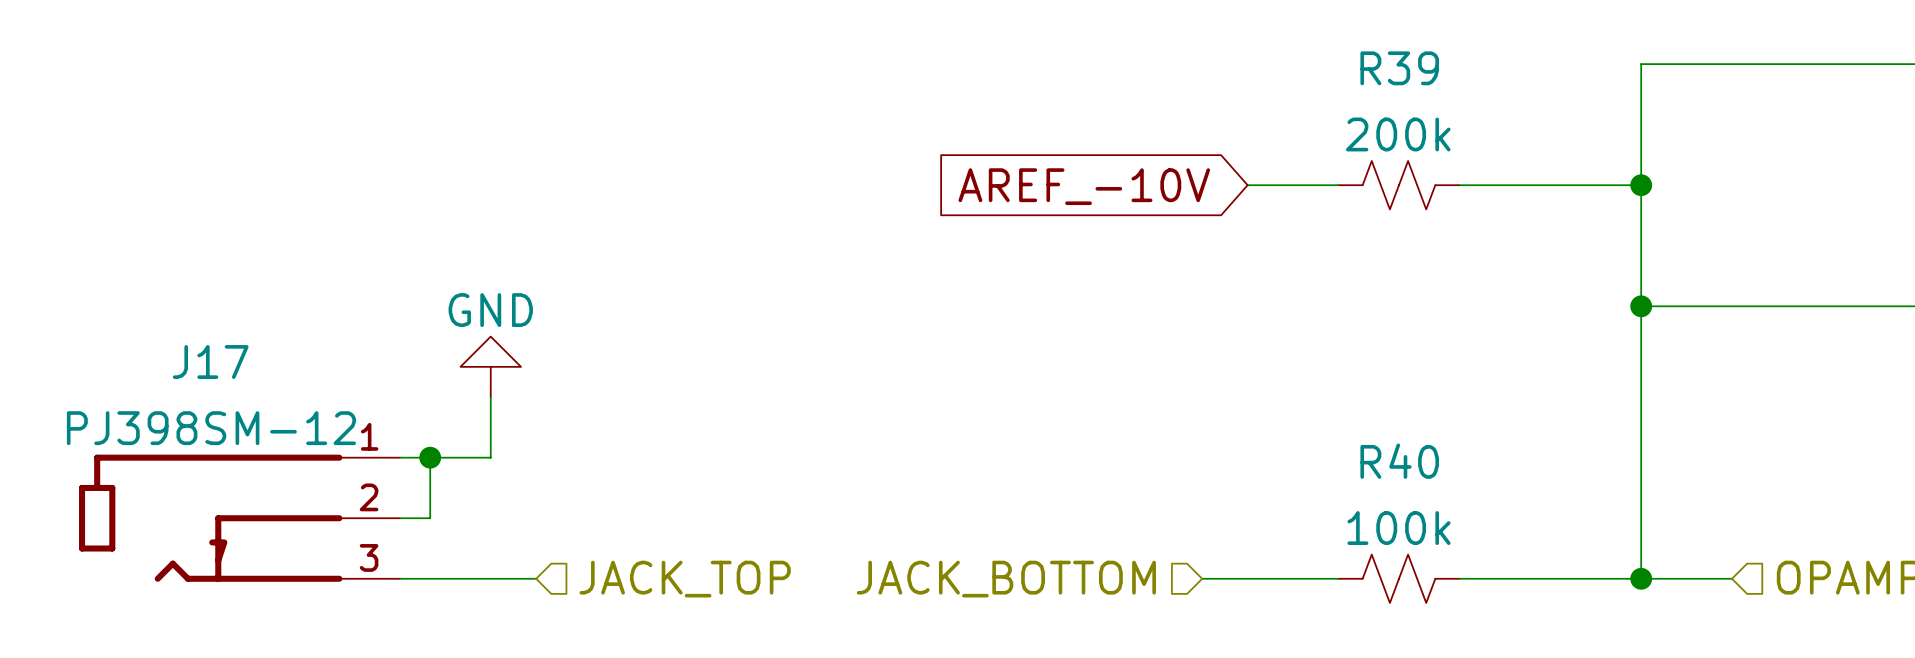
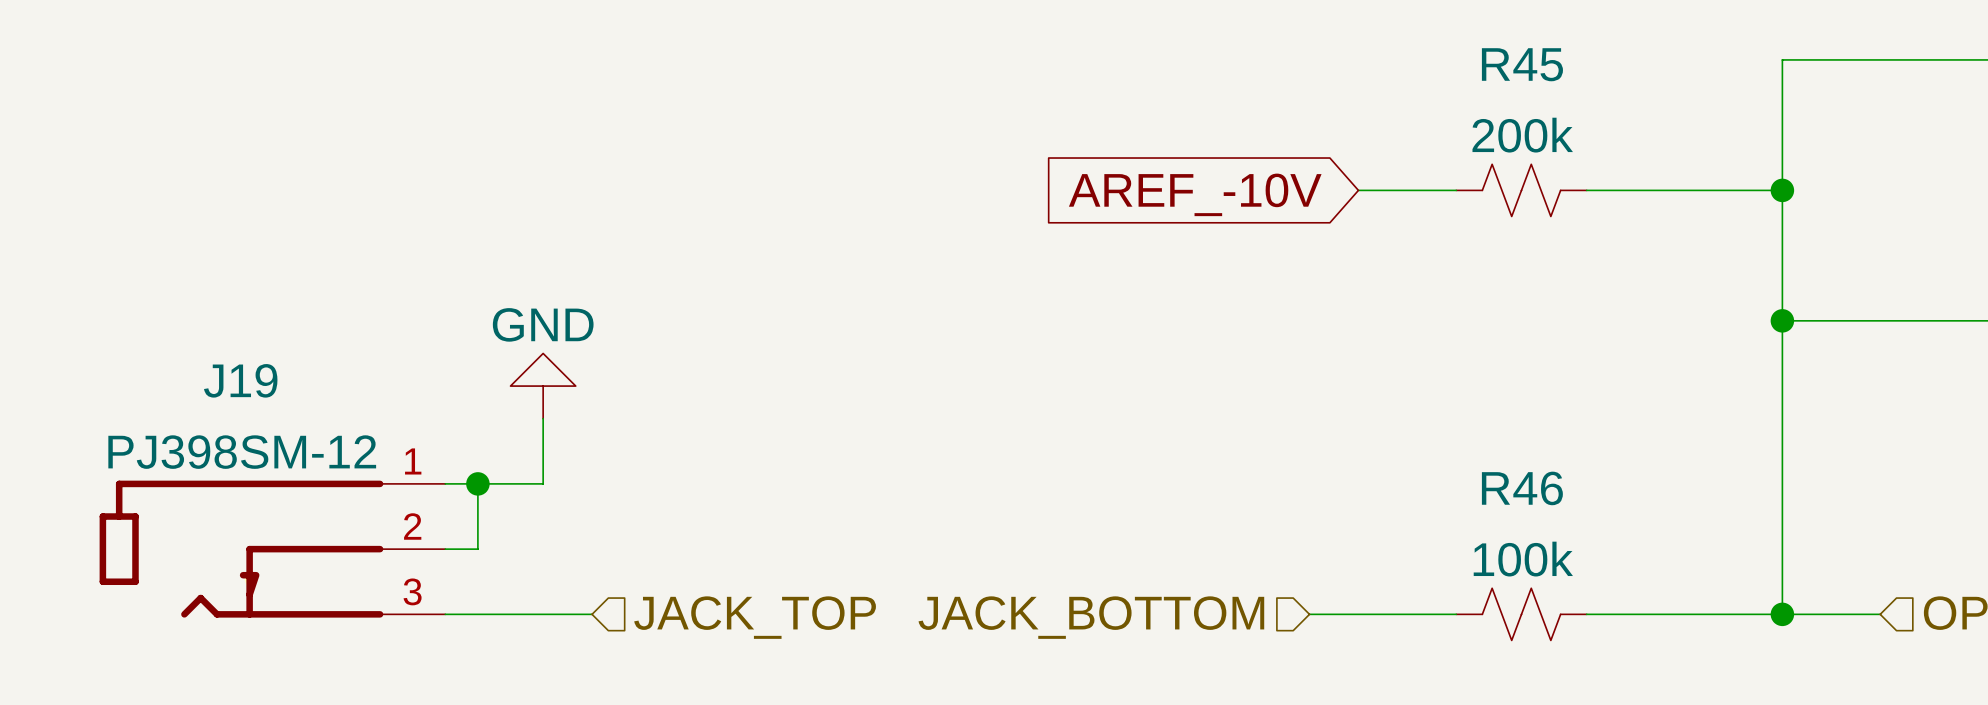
R39 name: R39 (1399, 68) -> R45 (1522, 64)
J17 name: J17 (210, 361) -> J19 (240, 380)
R40 name: R40 (1399, 461) -> R46 (1522, 488)

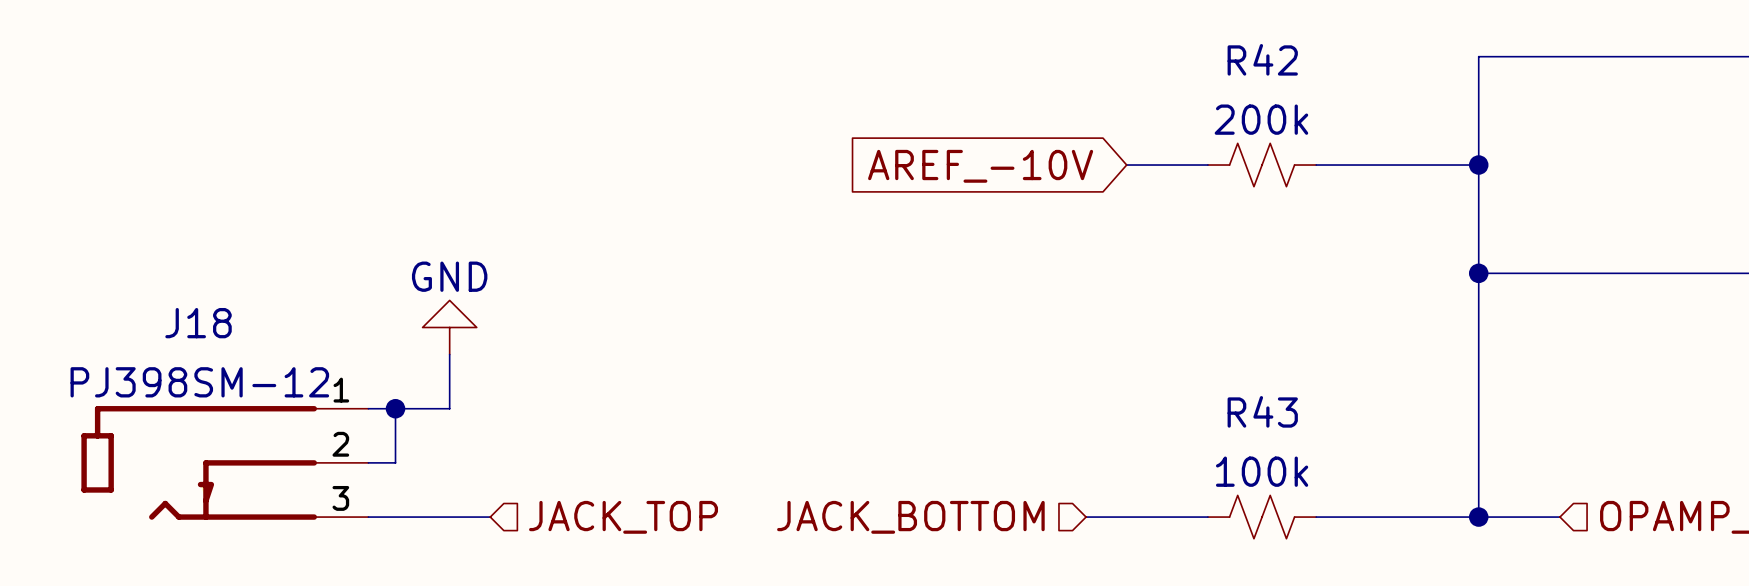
R45 name: R45 (1522, 64) -> R42 (1262, 59)
J19 name: J19 (240, 380) -> J18 (198, 323)
R46 name: R46 (1522, 488) -> R43 (1262, 411)

